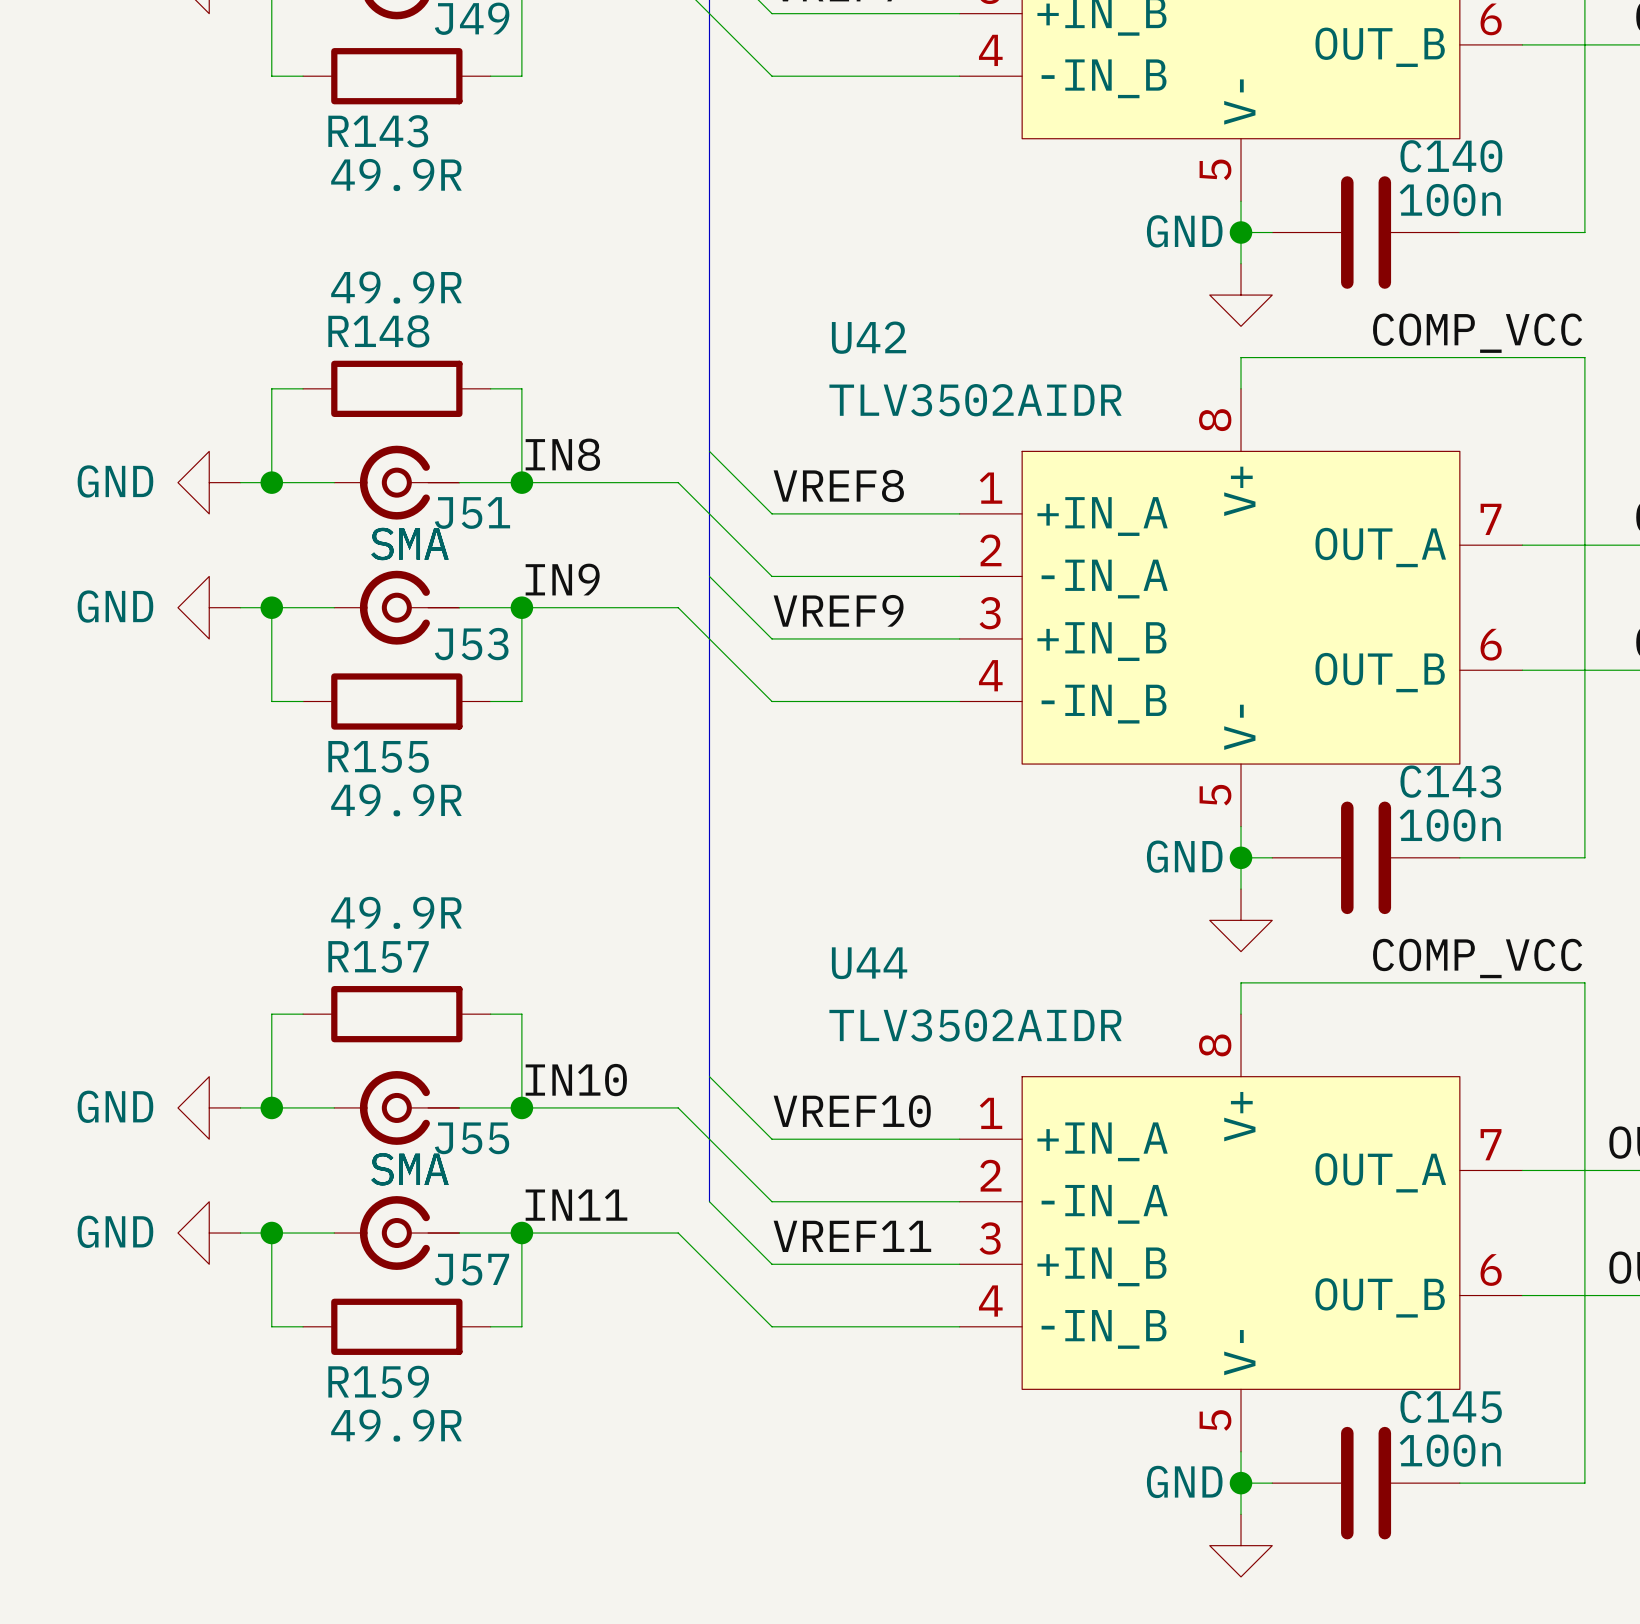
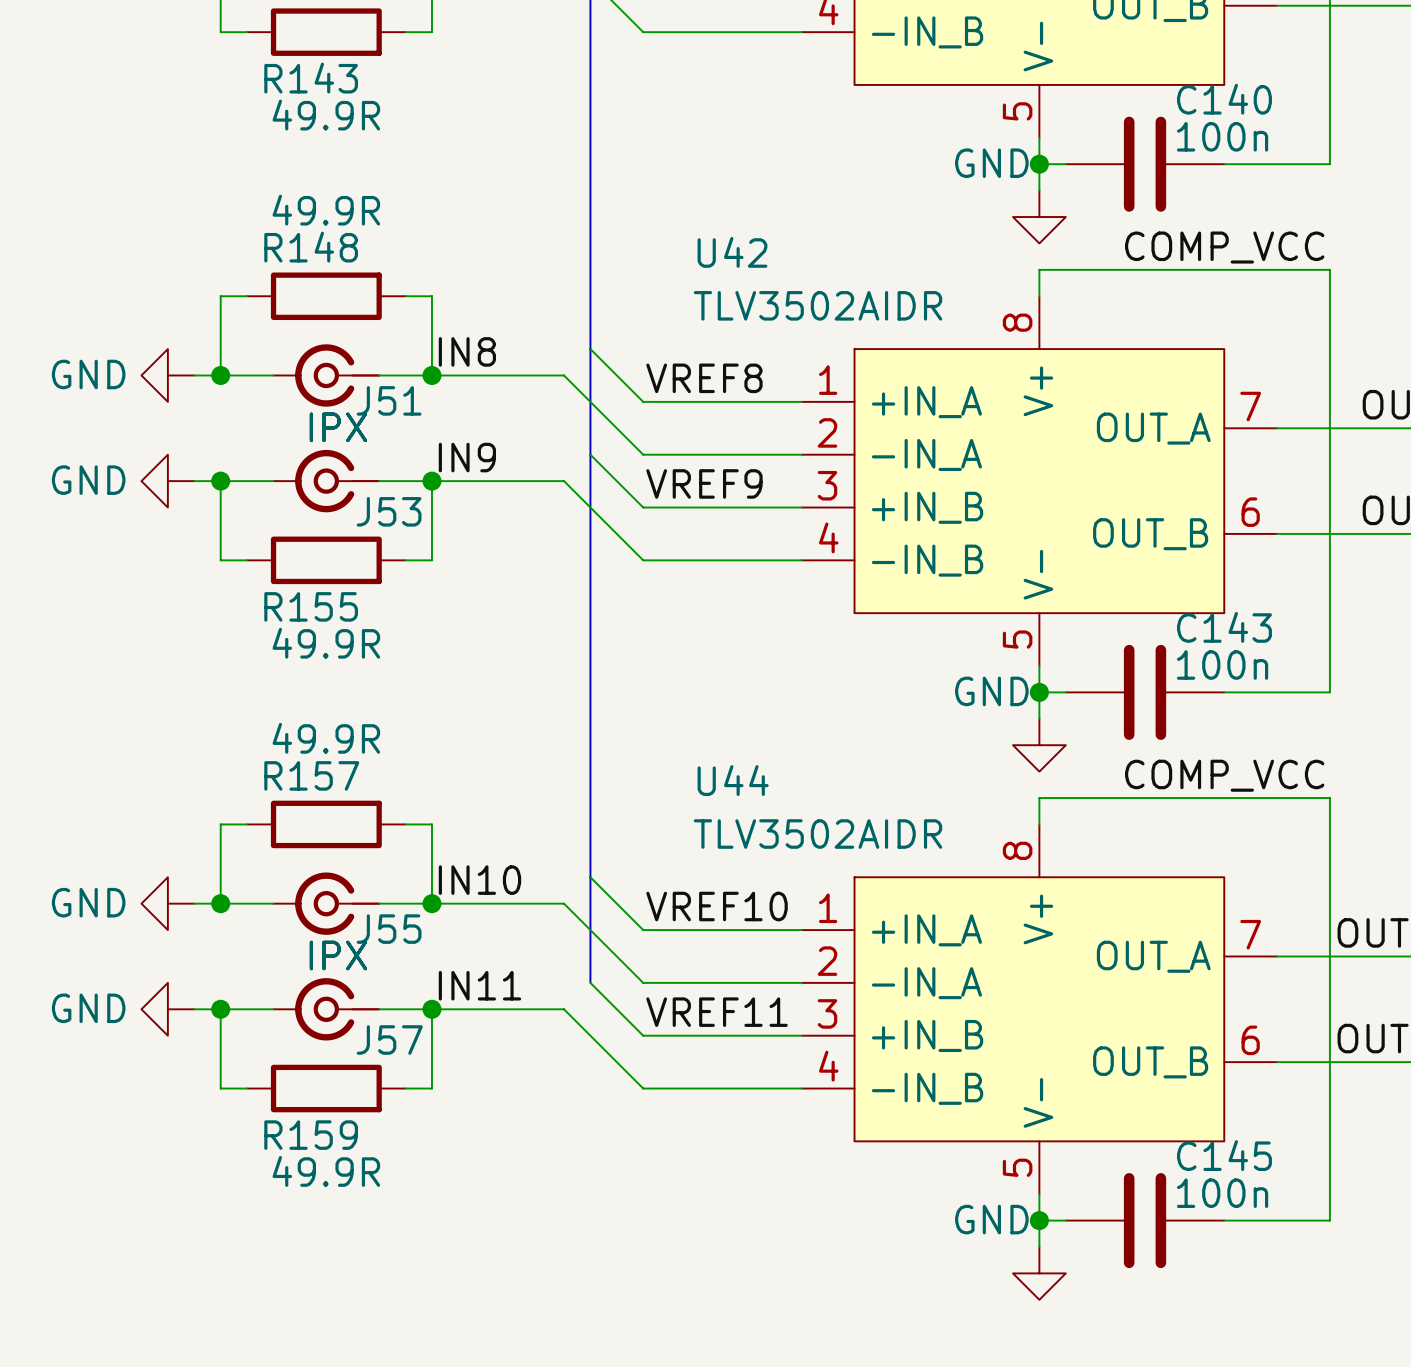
J53 value: SMA (409, 544) -> IPX (338, 427)
J51 value: SMA (409, 544) -> IPX (338, 427)
J57 value: SMA (409, 1169) -> IPX (338, 955)
J55 value: SMA (409, 1169) -> IPX (338, 955)

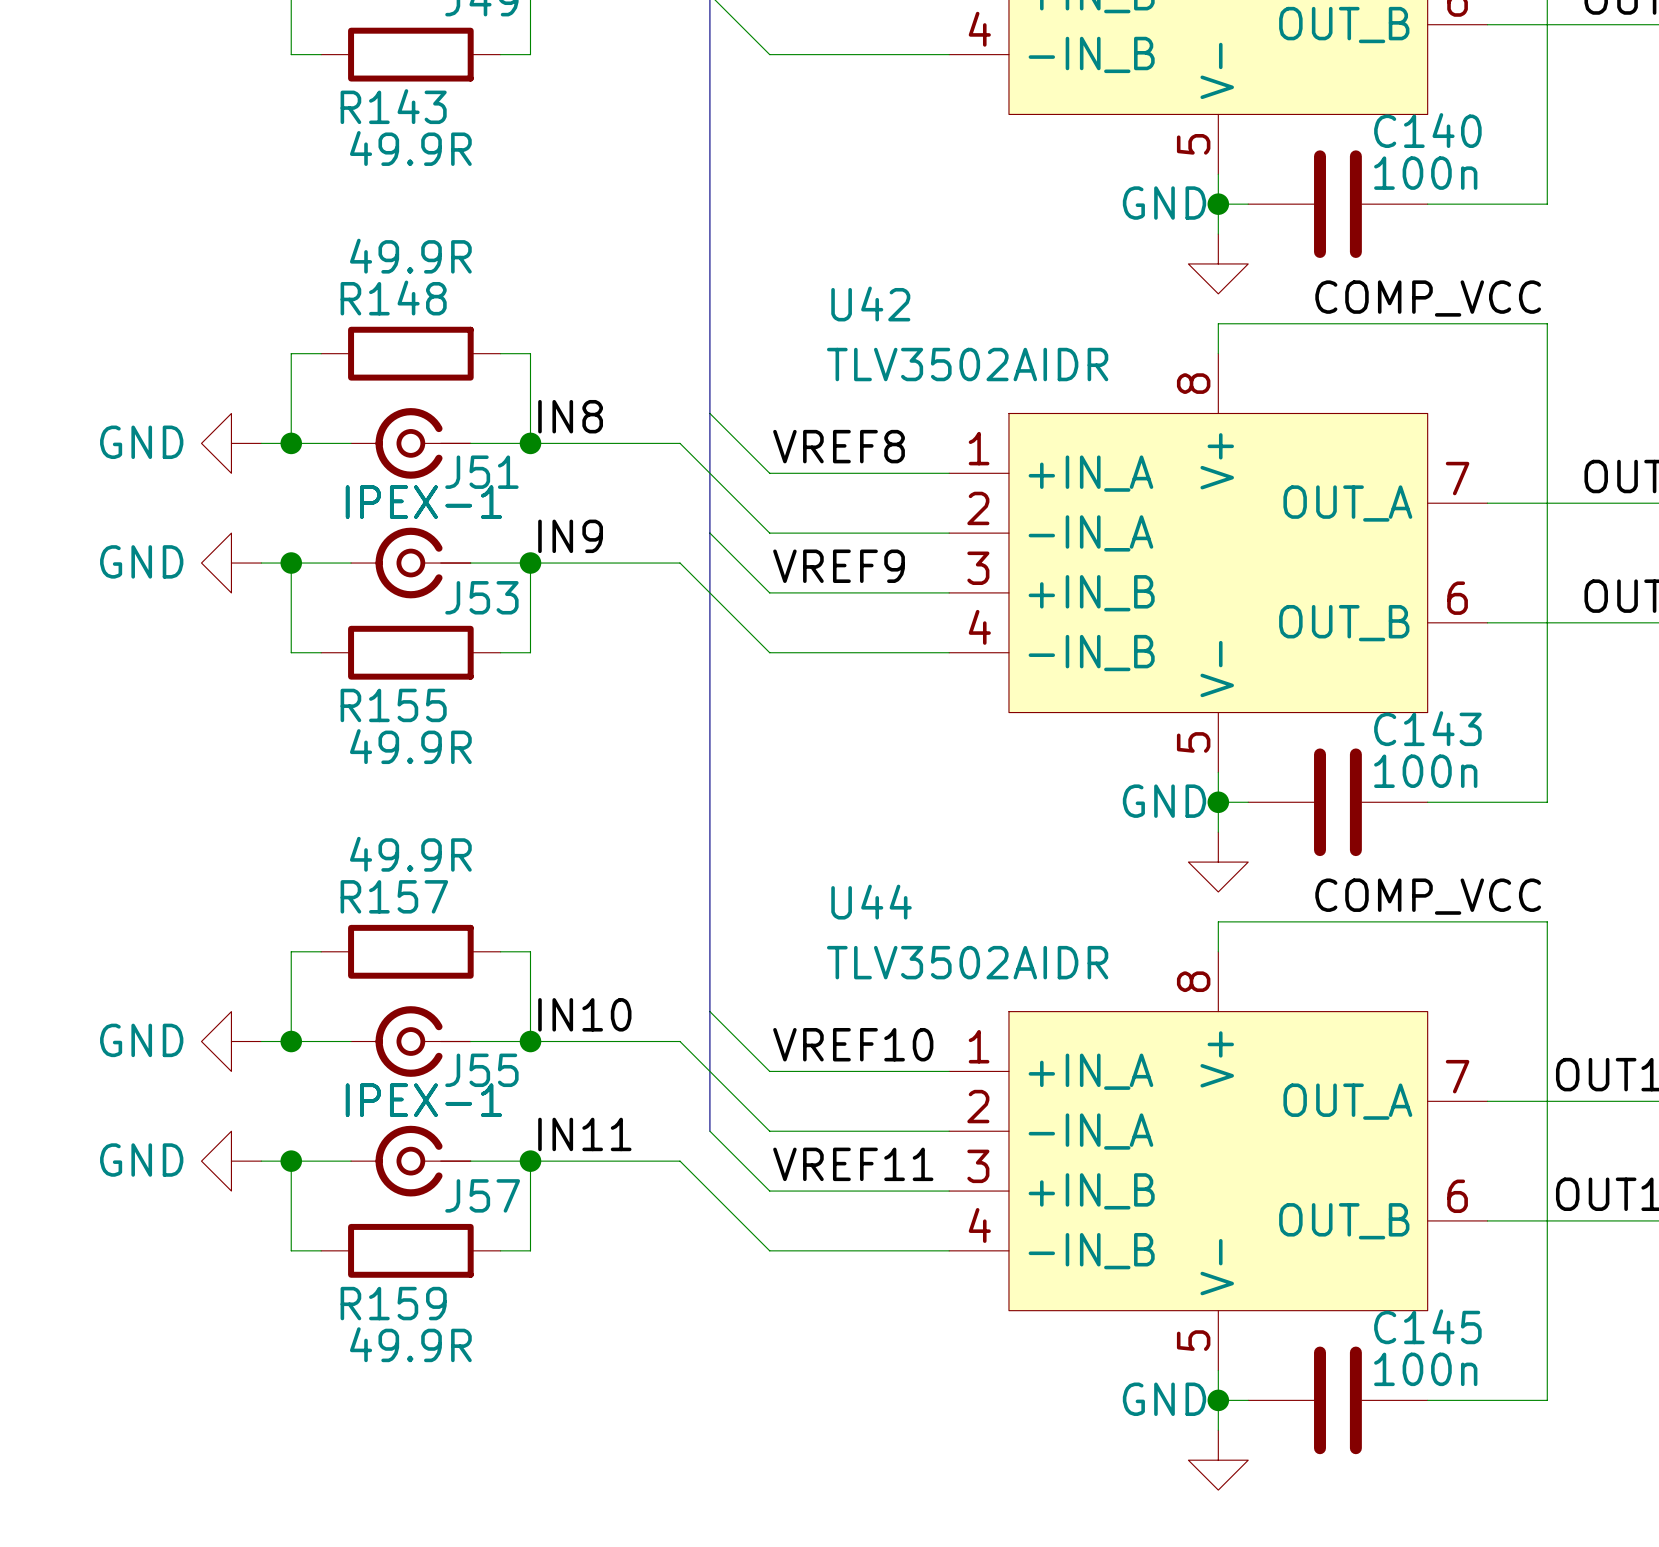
J53 value: IPX (338, 427) -> IPEX-1 (423, 502)
J51 value: IPX (338, 427) -> IPEX-1 (423, 502)
J57 value: IPX (338, 955) -> IPEX-1 (423, 1100)
J55 value: IPX (338, 955) -> IPEX-1 (423, 1100)

